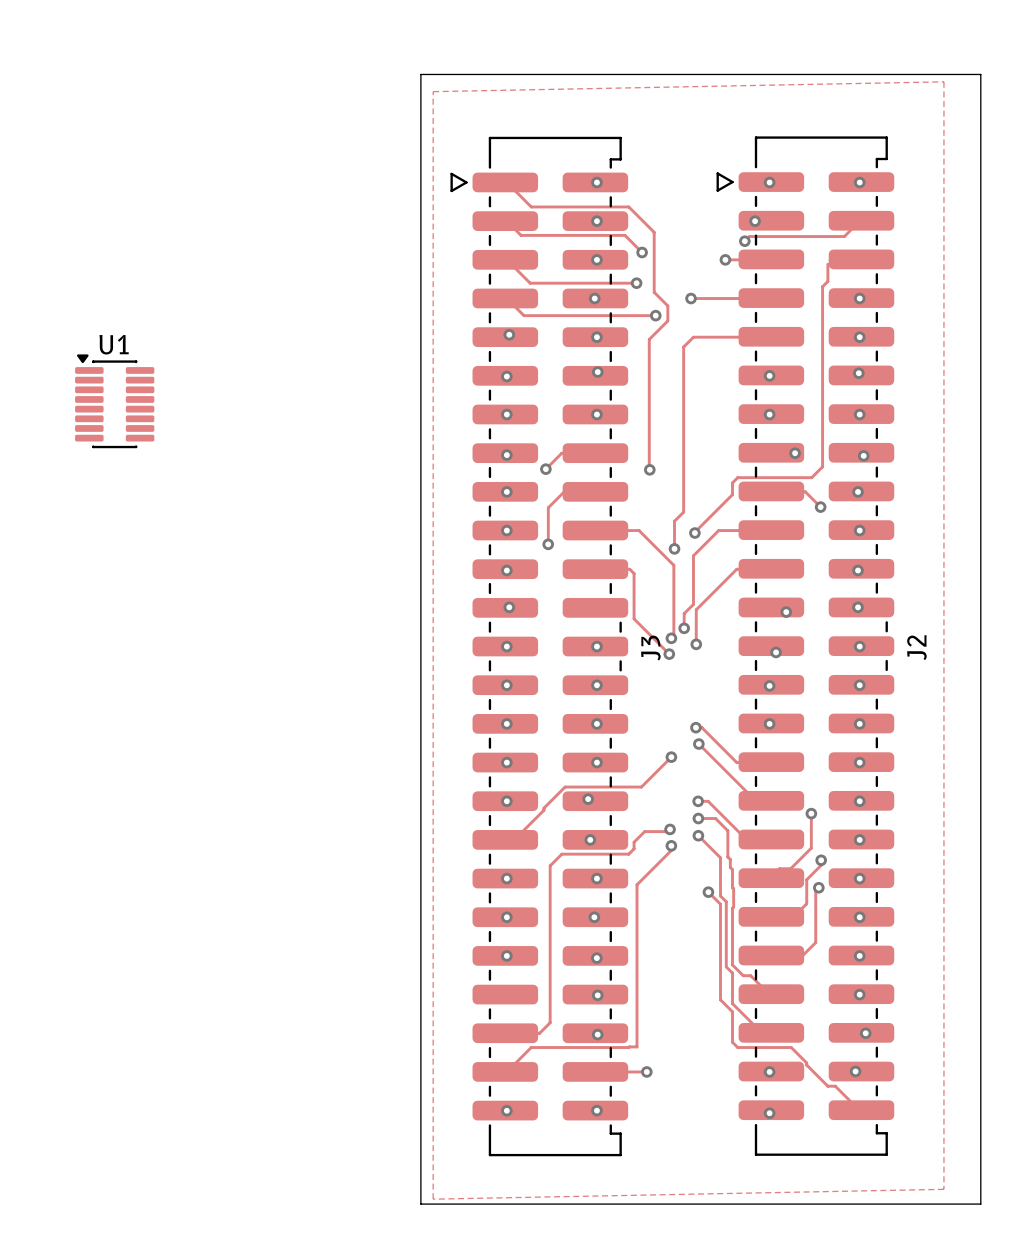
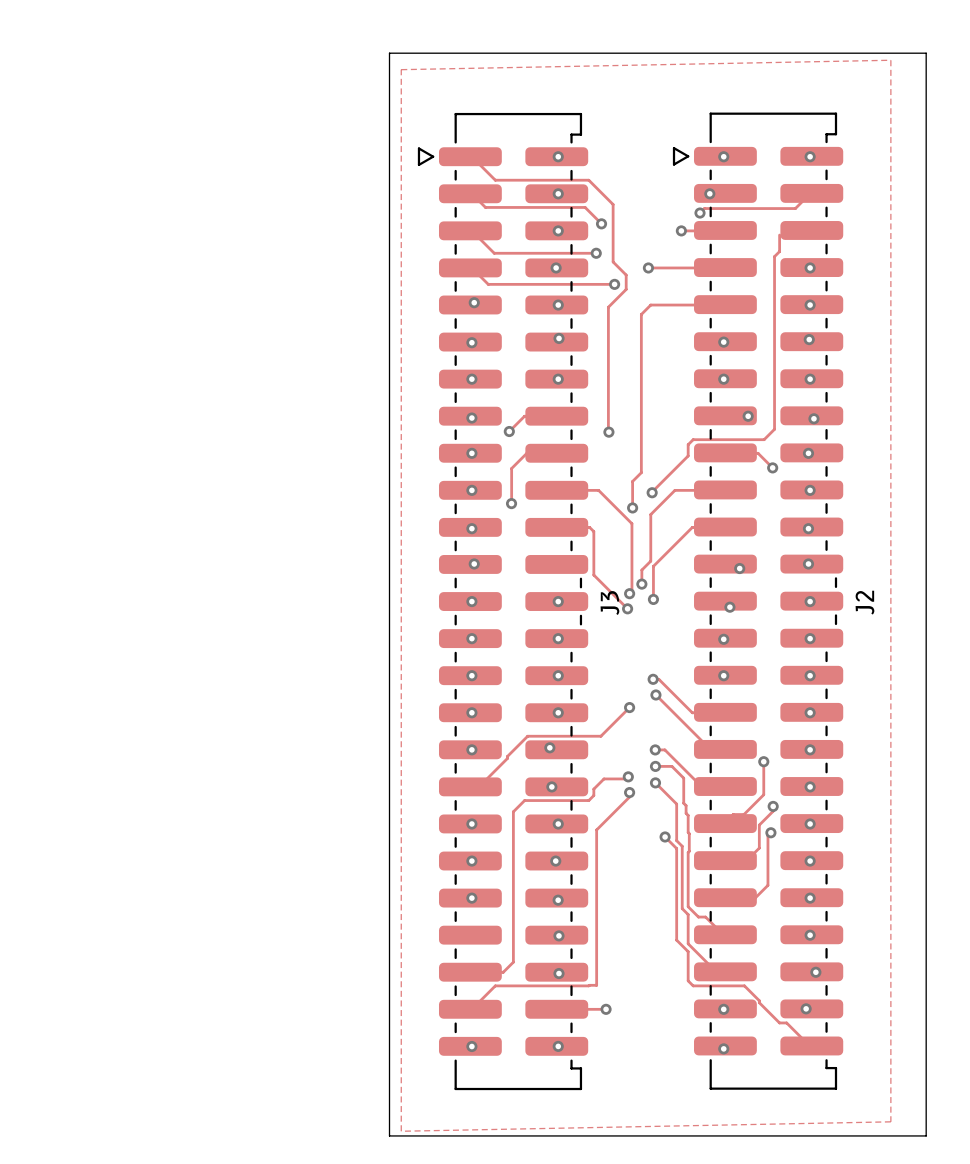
U1: (114, 401) -> none

